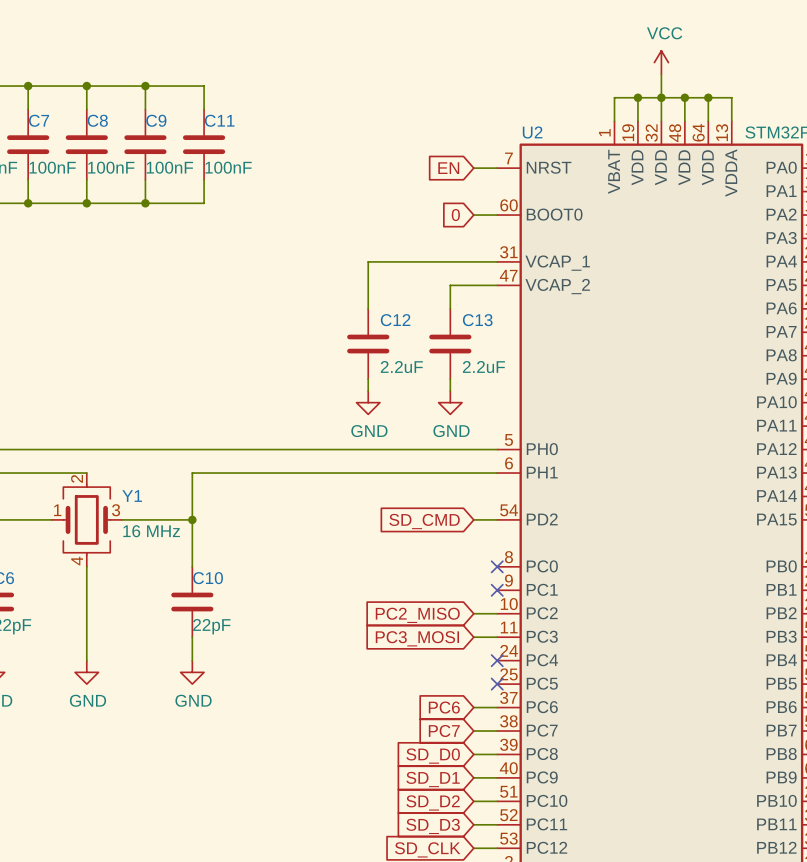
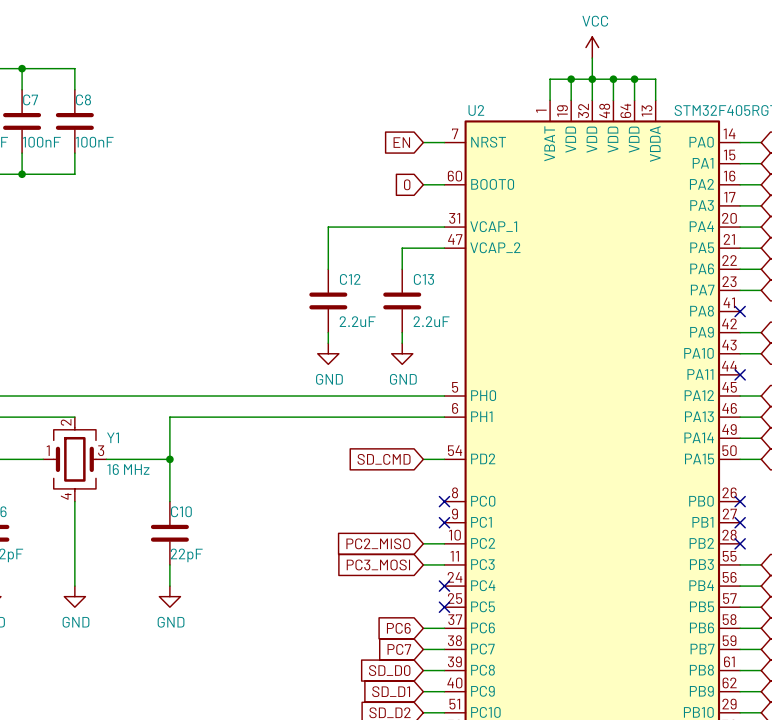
wire: (86, 86) (204, 86) (204, 109) -> none
junction: (86, 86) -> none
wire: (145, 86) (145, 109) -> none
junction: (145, 86) -> none
C9: 100nF (145, 144) -> none
C11: 100nF (204, 144) -> none
wire: (145, 179) (145, 203) -> none
wire: (204, 179) (204, 203) (86, 203) -> none
junction: (86, 203) -> none
junction: (145, 203) -> none

